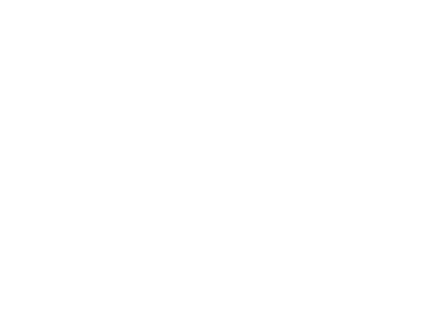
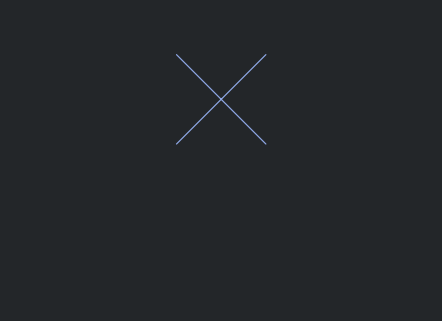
no-connect mark: none -> (221, 99)

